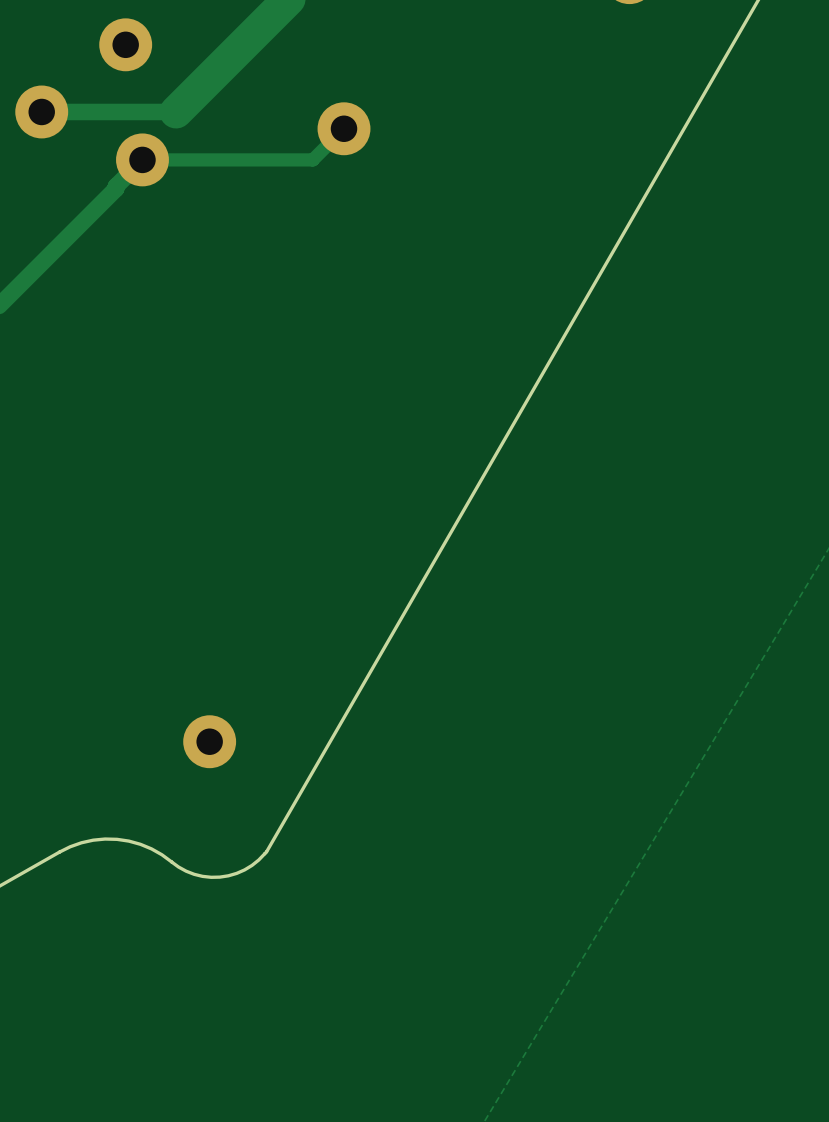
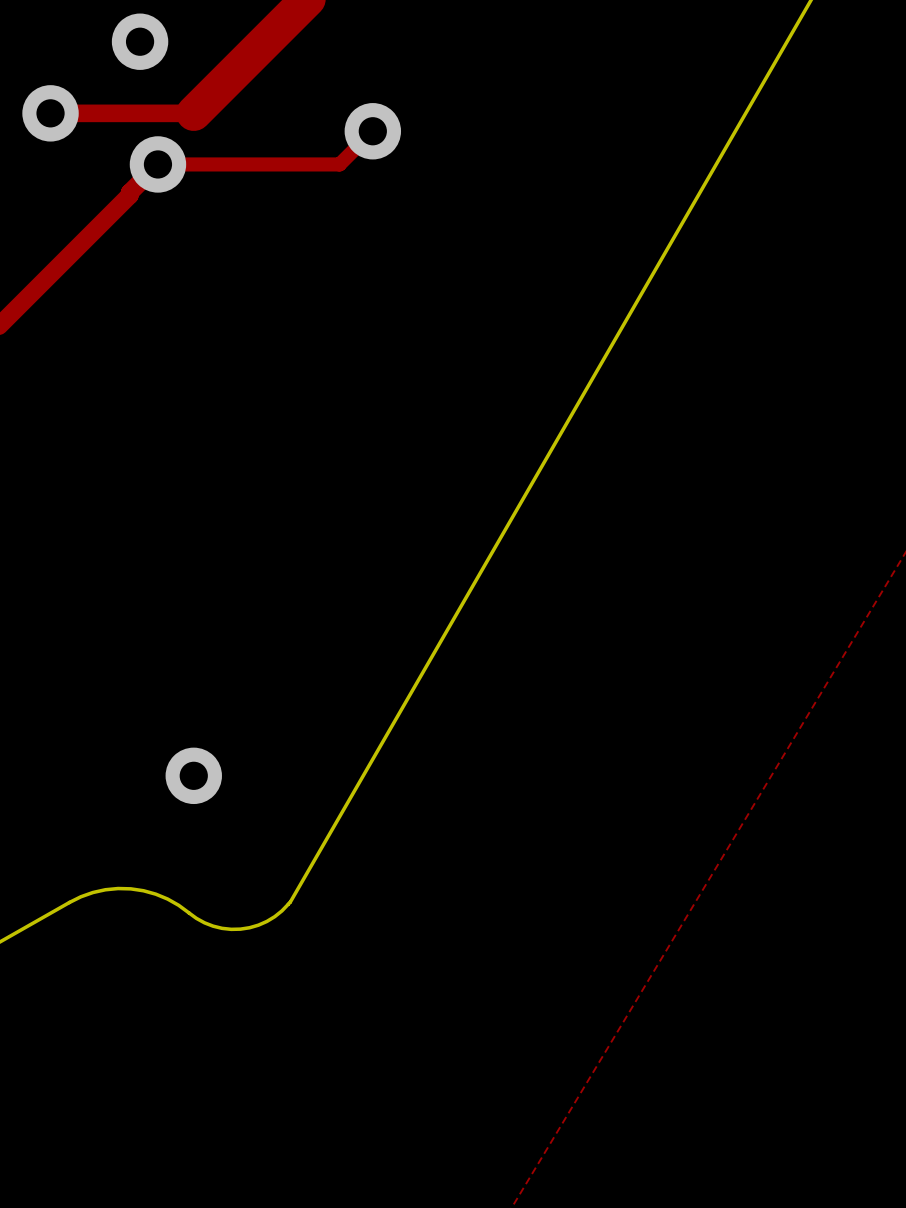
via position: (209, 741) -> (193, 775)

